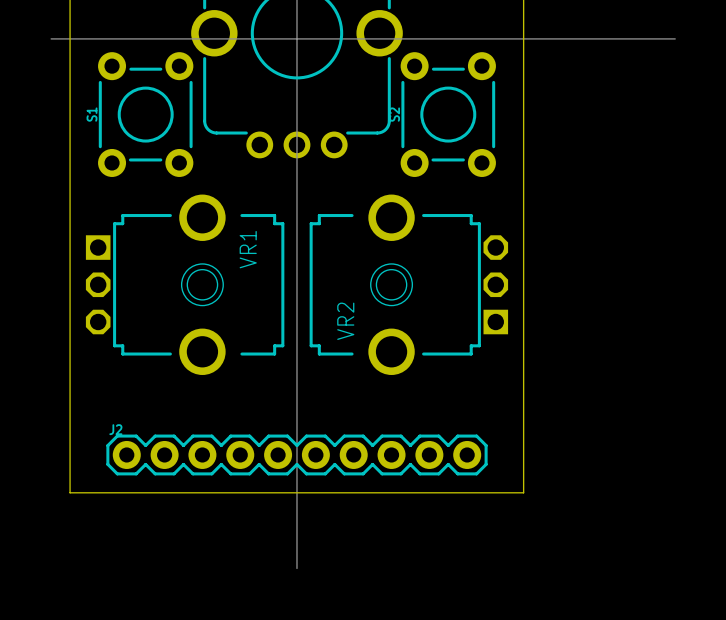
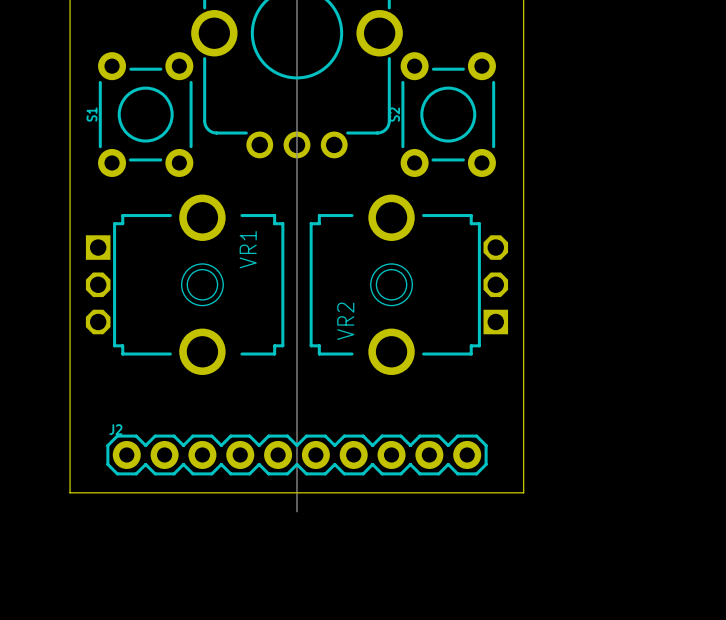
line: (51, 38) (675, 38) -> none
line: (296, 511) (296, 568) -> none

